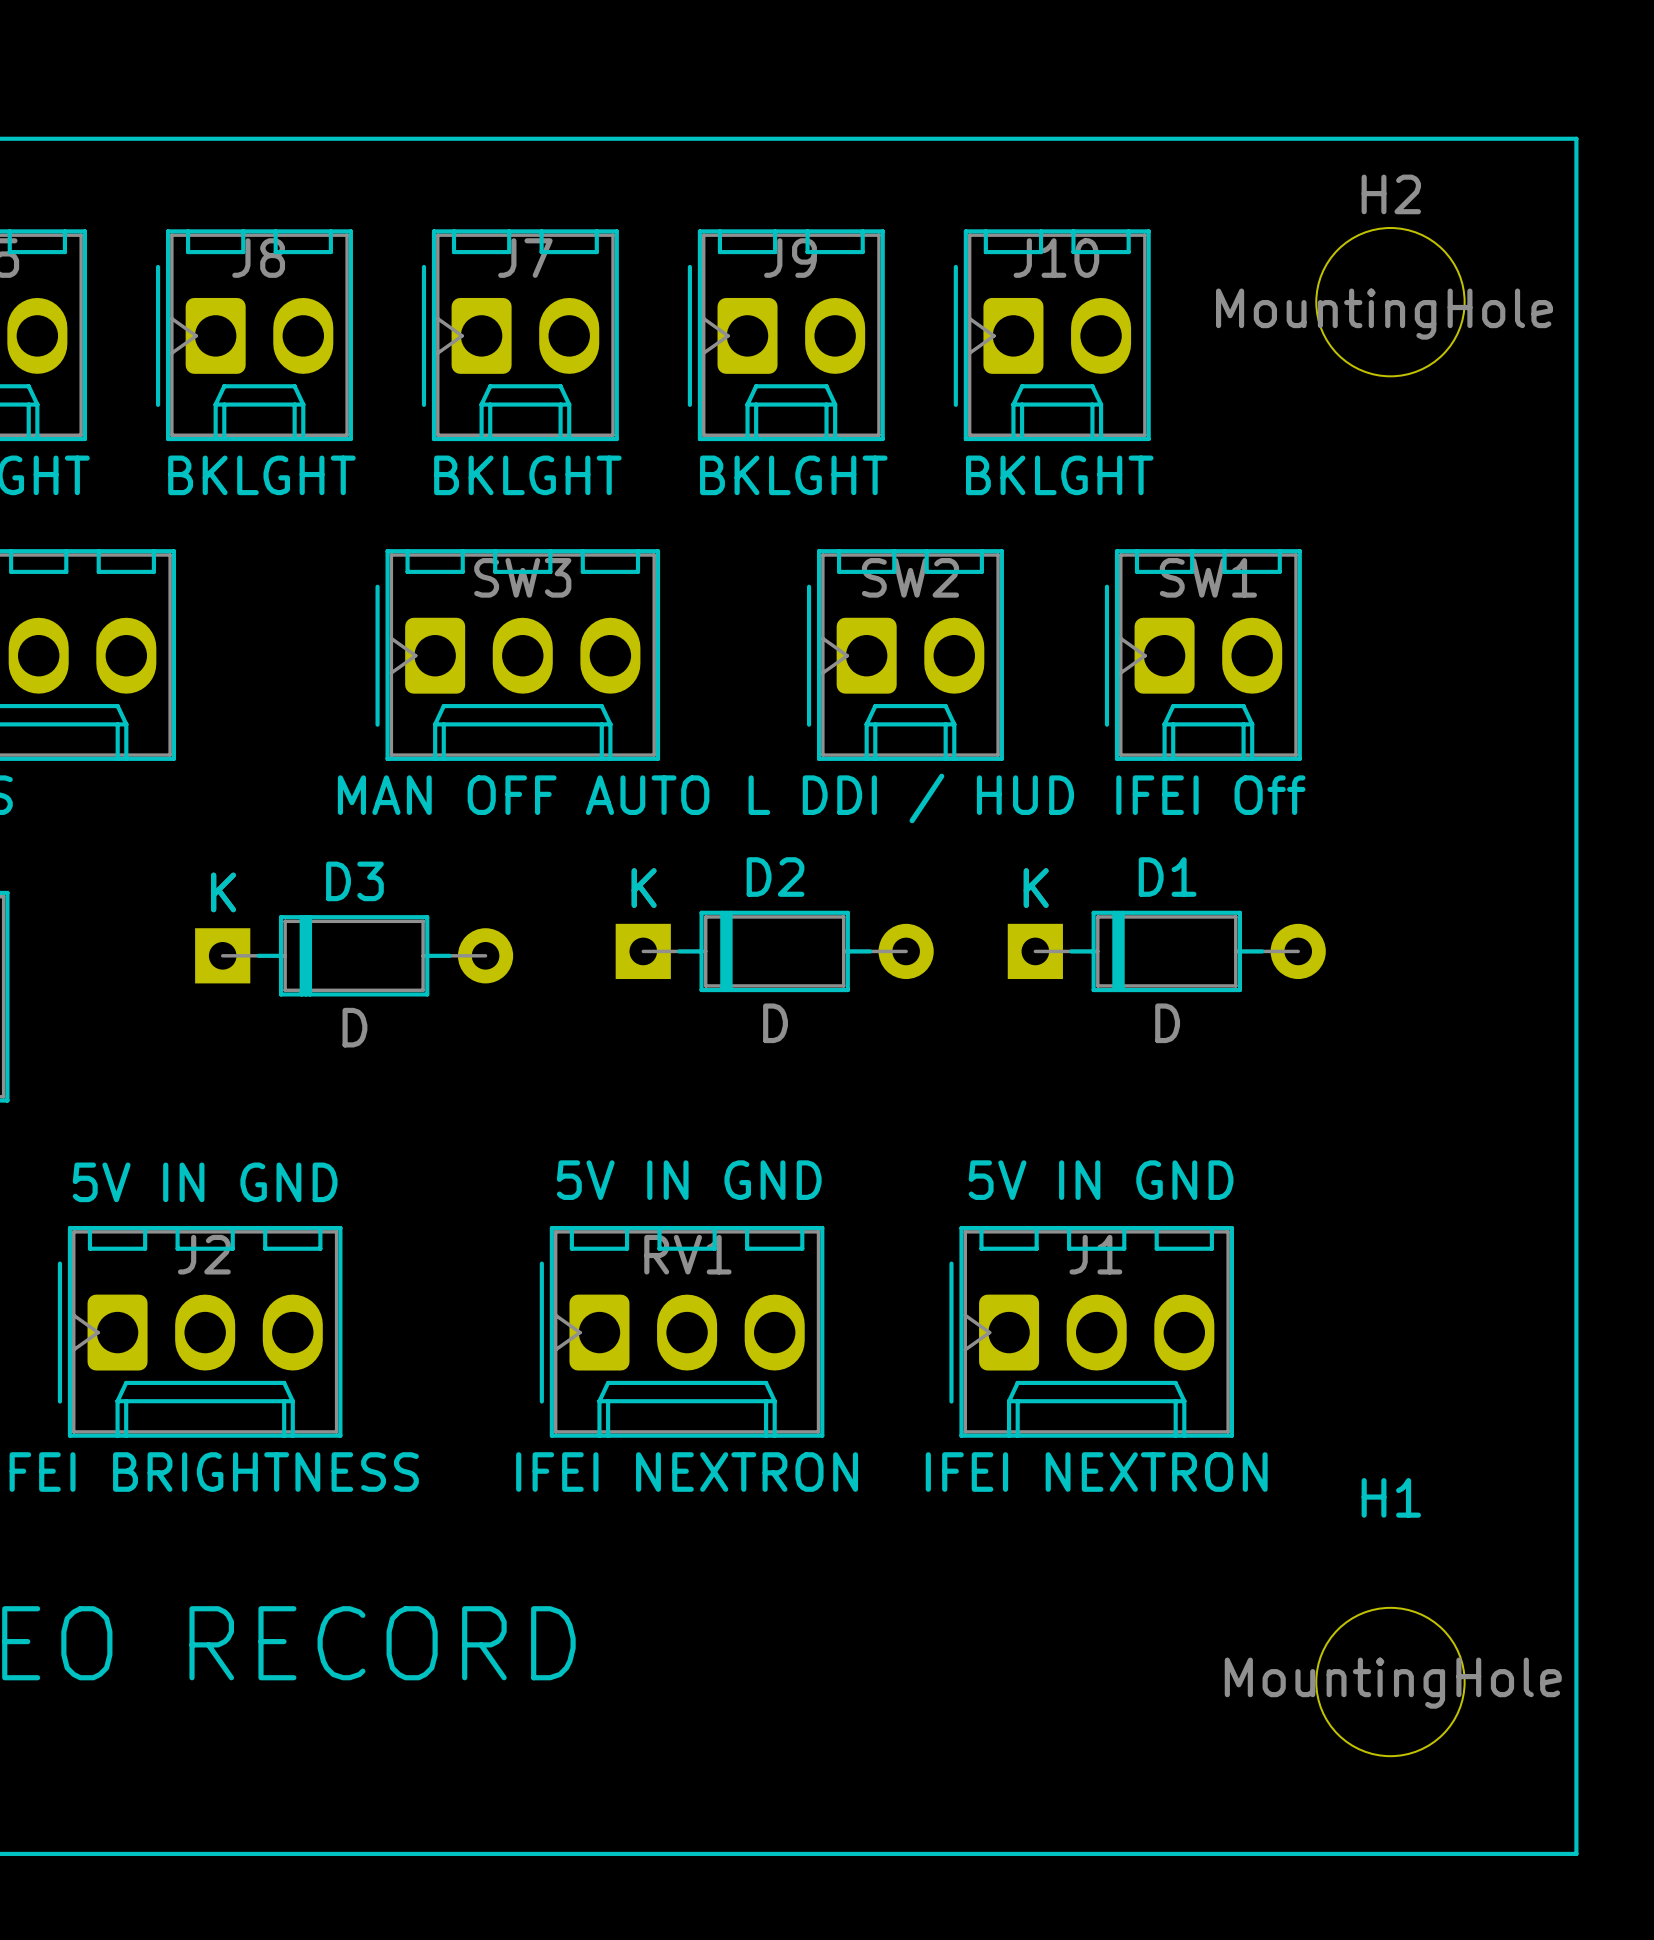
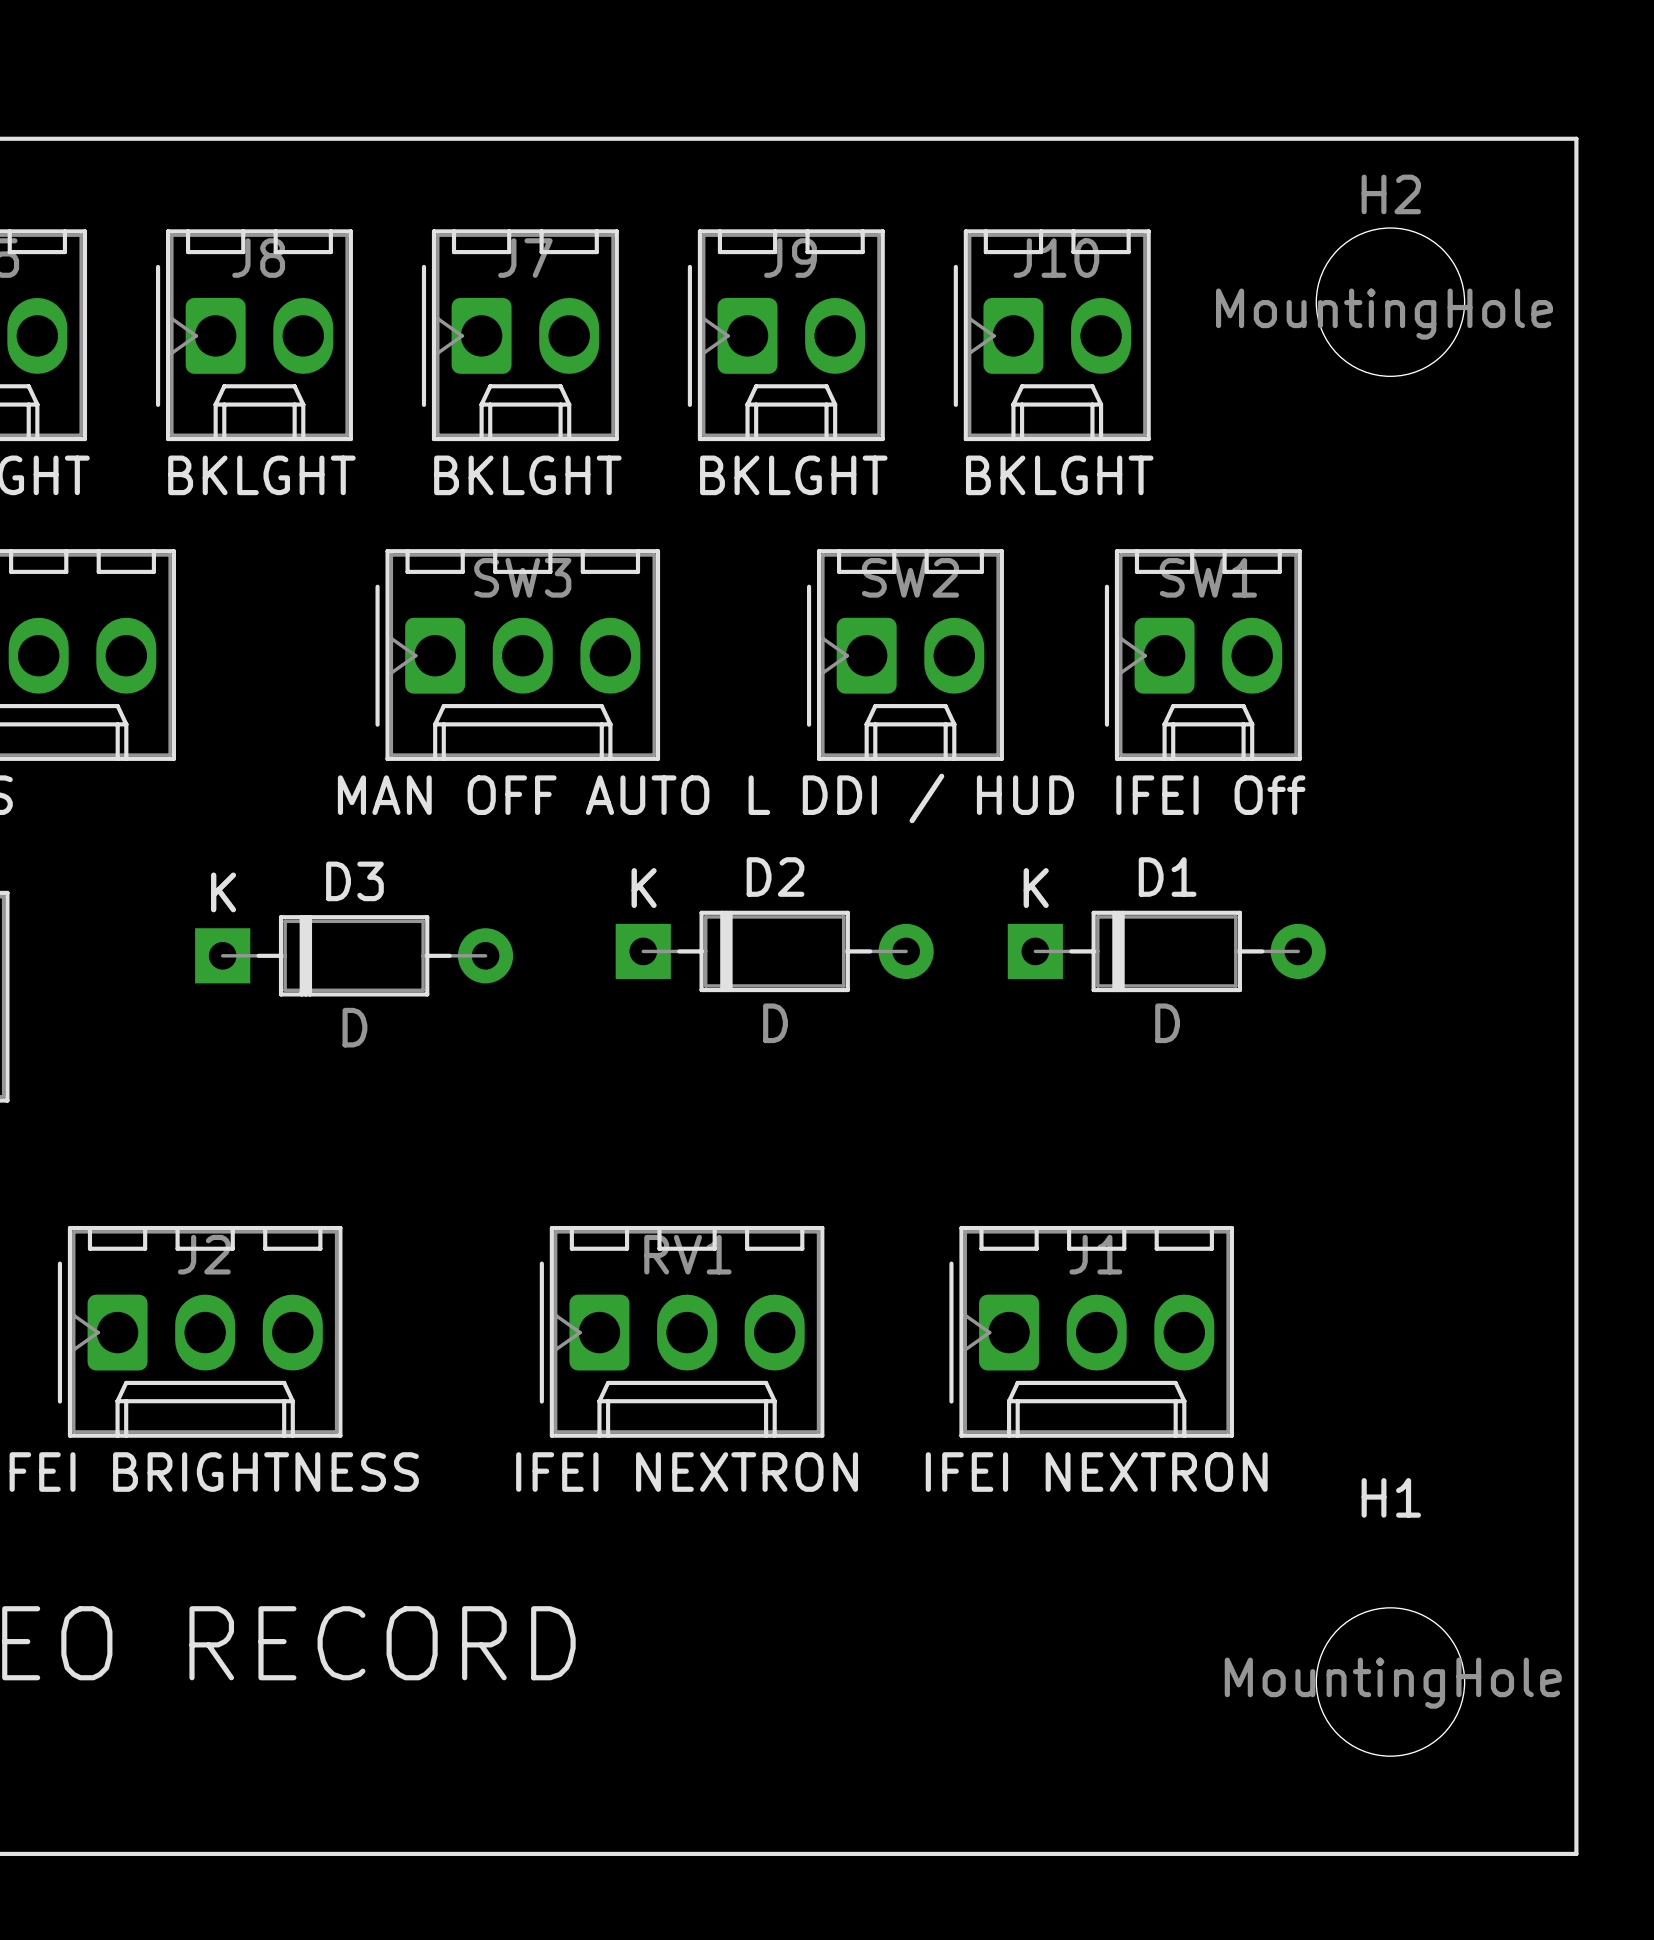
text: 5V IN GND (689, 1180) -> none
text: 5V IN GND (1101, 1180) -> none
text: 5V IN GND (205, 1182) -> none

